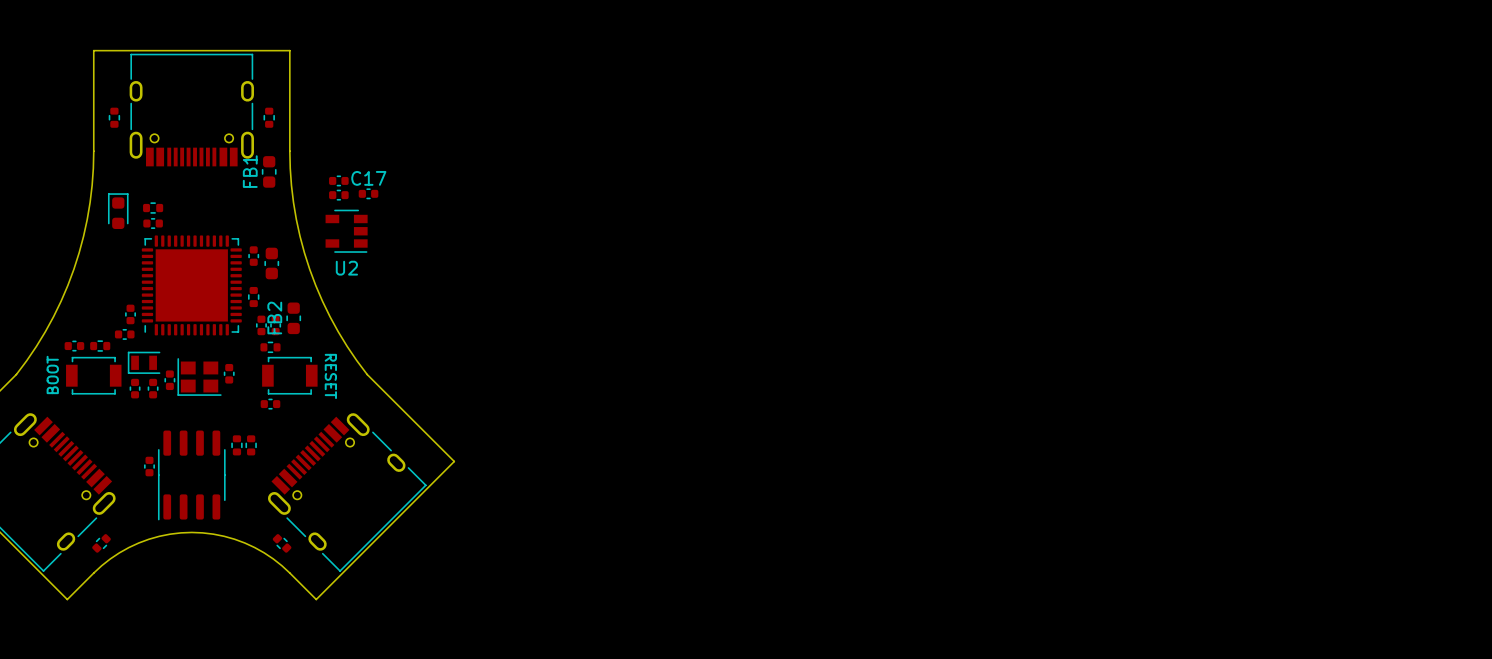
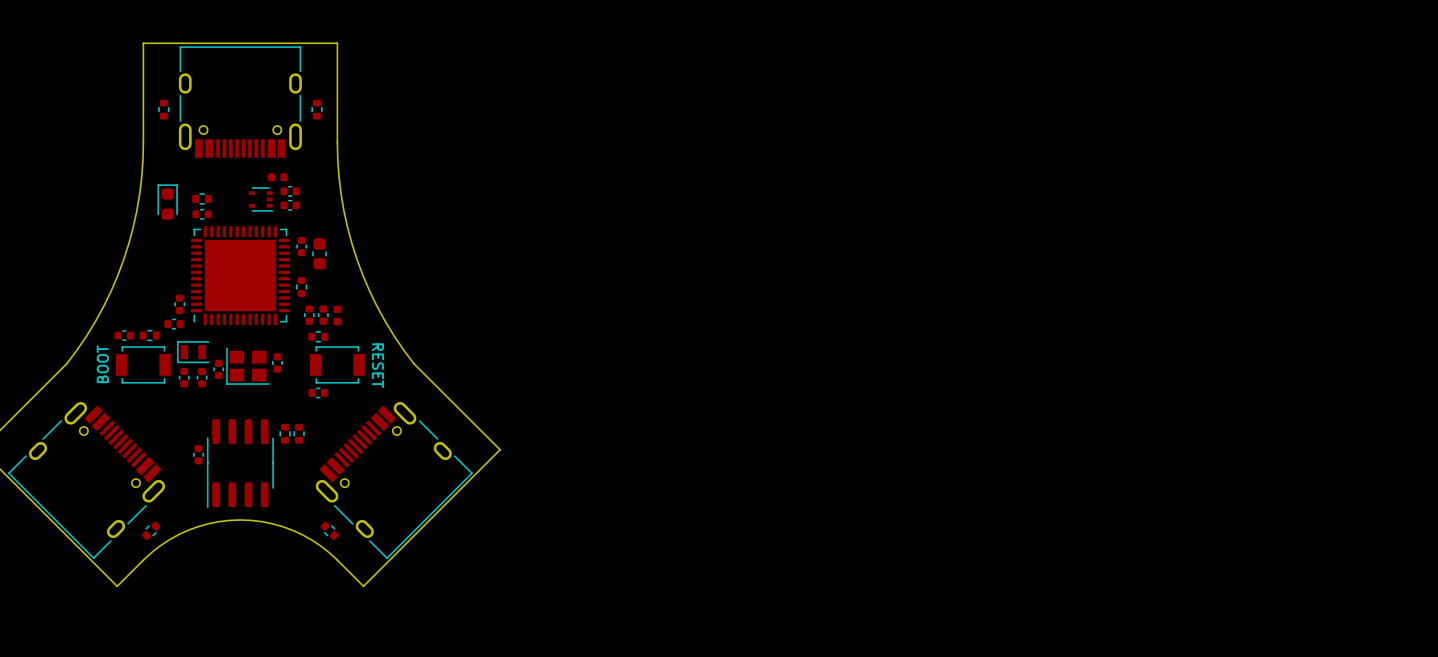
FB1: (269, 171) -> none
part: (338, 180) -> none
part: none -> (277, 177)
C17: (368, 193) -> none
part: (338, 195) -> none
part: none -> (290, 191)
part: none -> (261, 199)
part: none -> (290, 205)
U2: (346, 231) -> none
FB2: (293, 318) -> none
part: none -> (337, 315)

